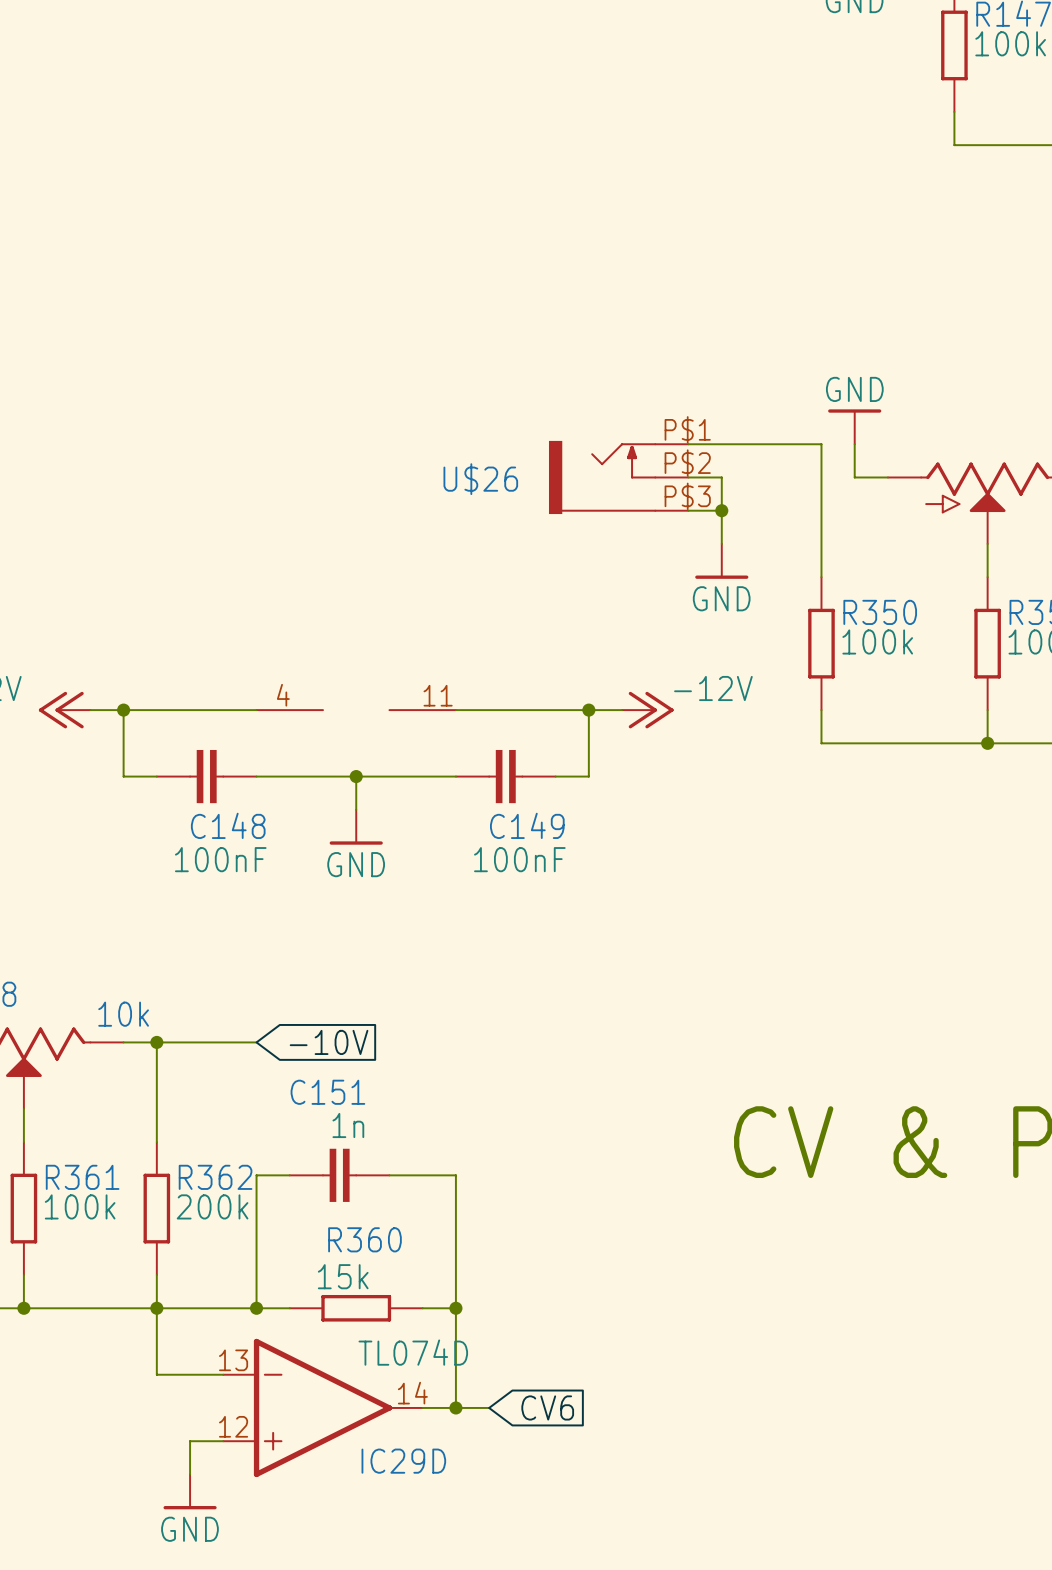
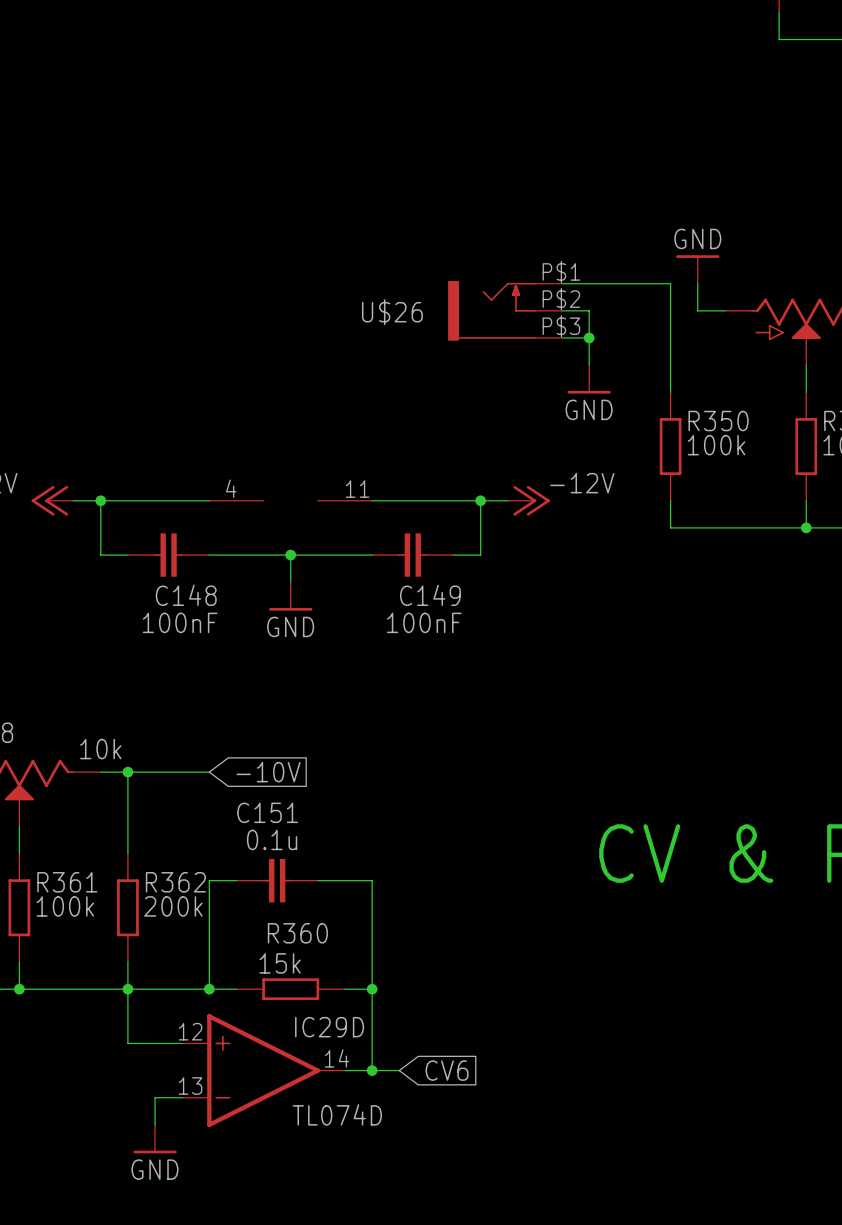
C151 value: 1n (348, 1125) -> 0.1u (272, 839)
IC29D flip: as is (323, 1407) -> up-down (263, 1070)

